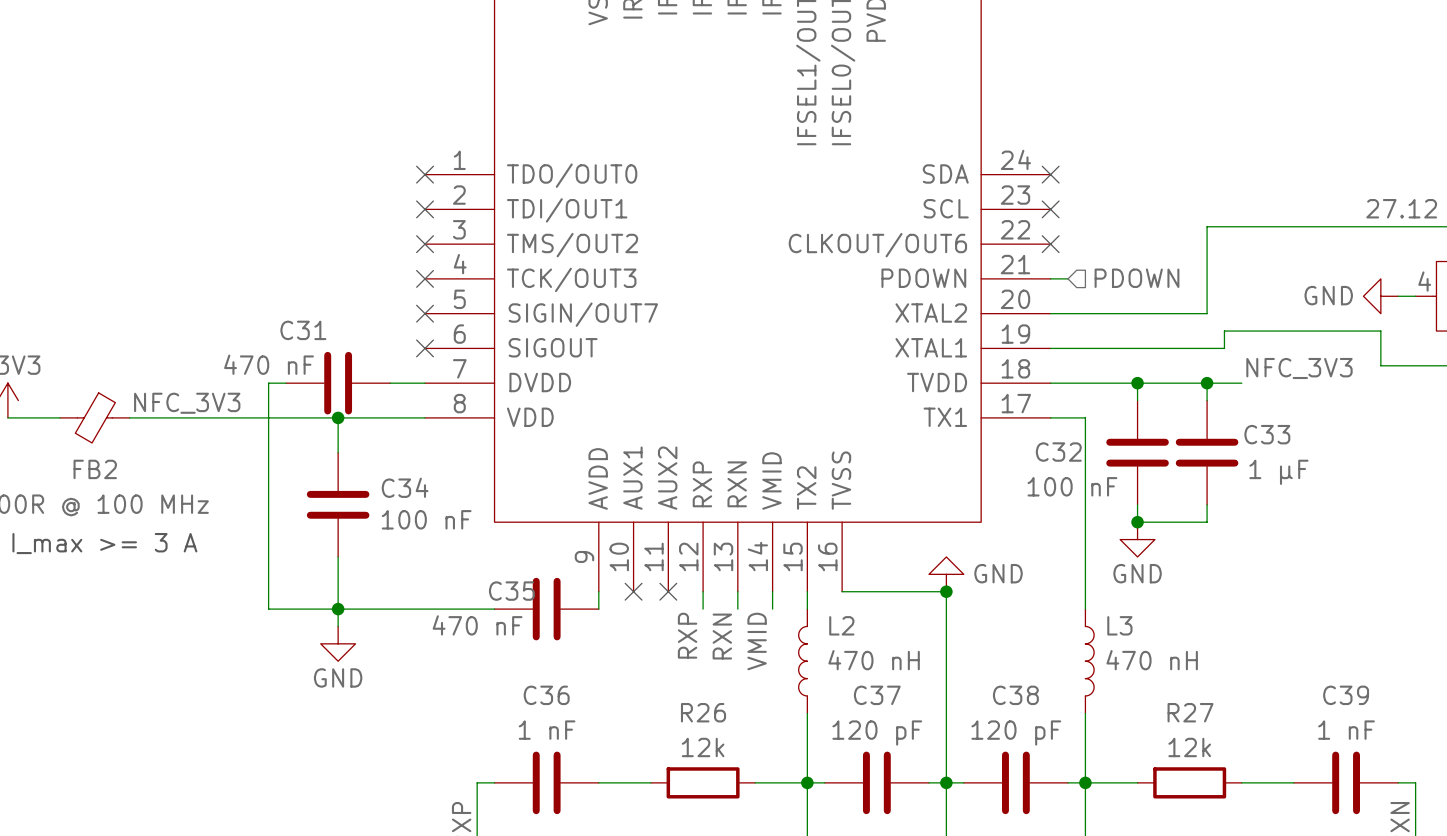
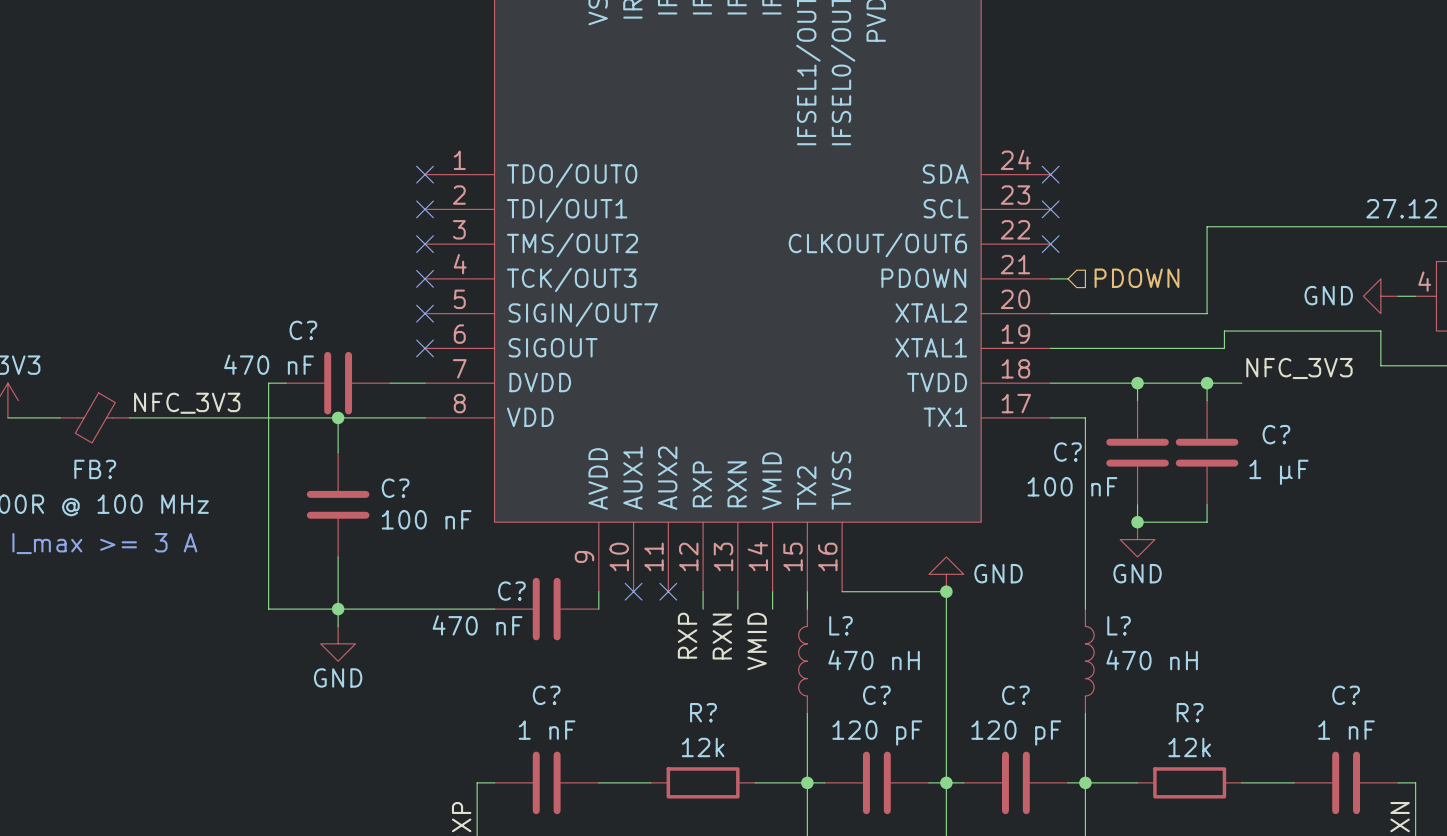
C31 name: C31 (303, 330) -> C? (303, 330)
C33 name: C33 (1267, 434) -> C? (1276, 434)
C32 name: C32 (1058, 452) -> C? (1067, 452)
FB2 name: FB2 (95, 469) -> FB? (95, 469)
C34 name: C34 (405, 487) -> C? (395, 488)
C35 name: C35 (511, 591) -> C? (511, 591)
L2 name: L2 (841, 625) -> L? (841, 625)
L3 name: L3 (1119, 625) -> L? (1119, 625)
C36 name: C36 (546, 695) -> C? (546, 695)
C37 name: C37 (877, 695) -> C? (876, 695)
C38 name: C38 (1015, 695) -> C? (1015, 695)
C39 name: C39 (1346, 695) -> C? (1346, 695)
R26 name: R26 (703, 712) -> R? (703, 712)
R27 name: R27 (1190, 712) -> R? (1190, 712)

